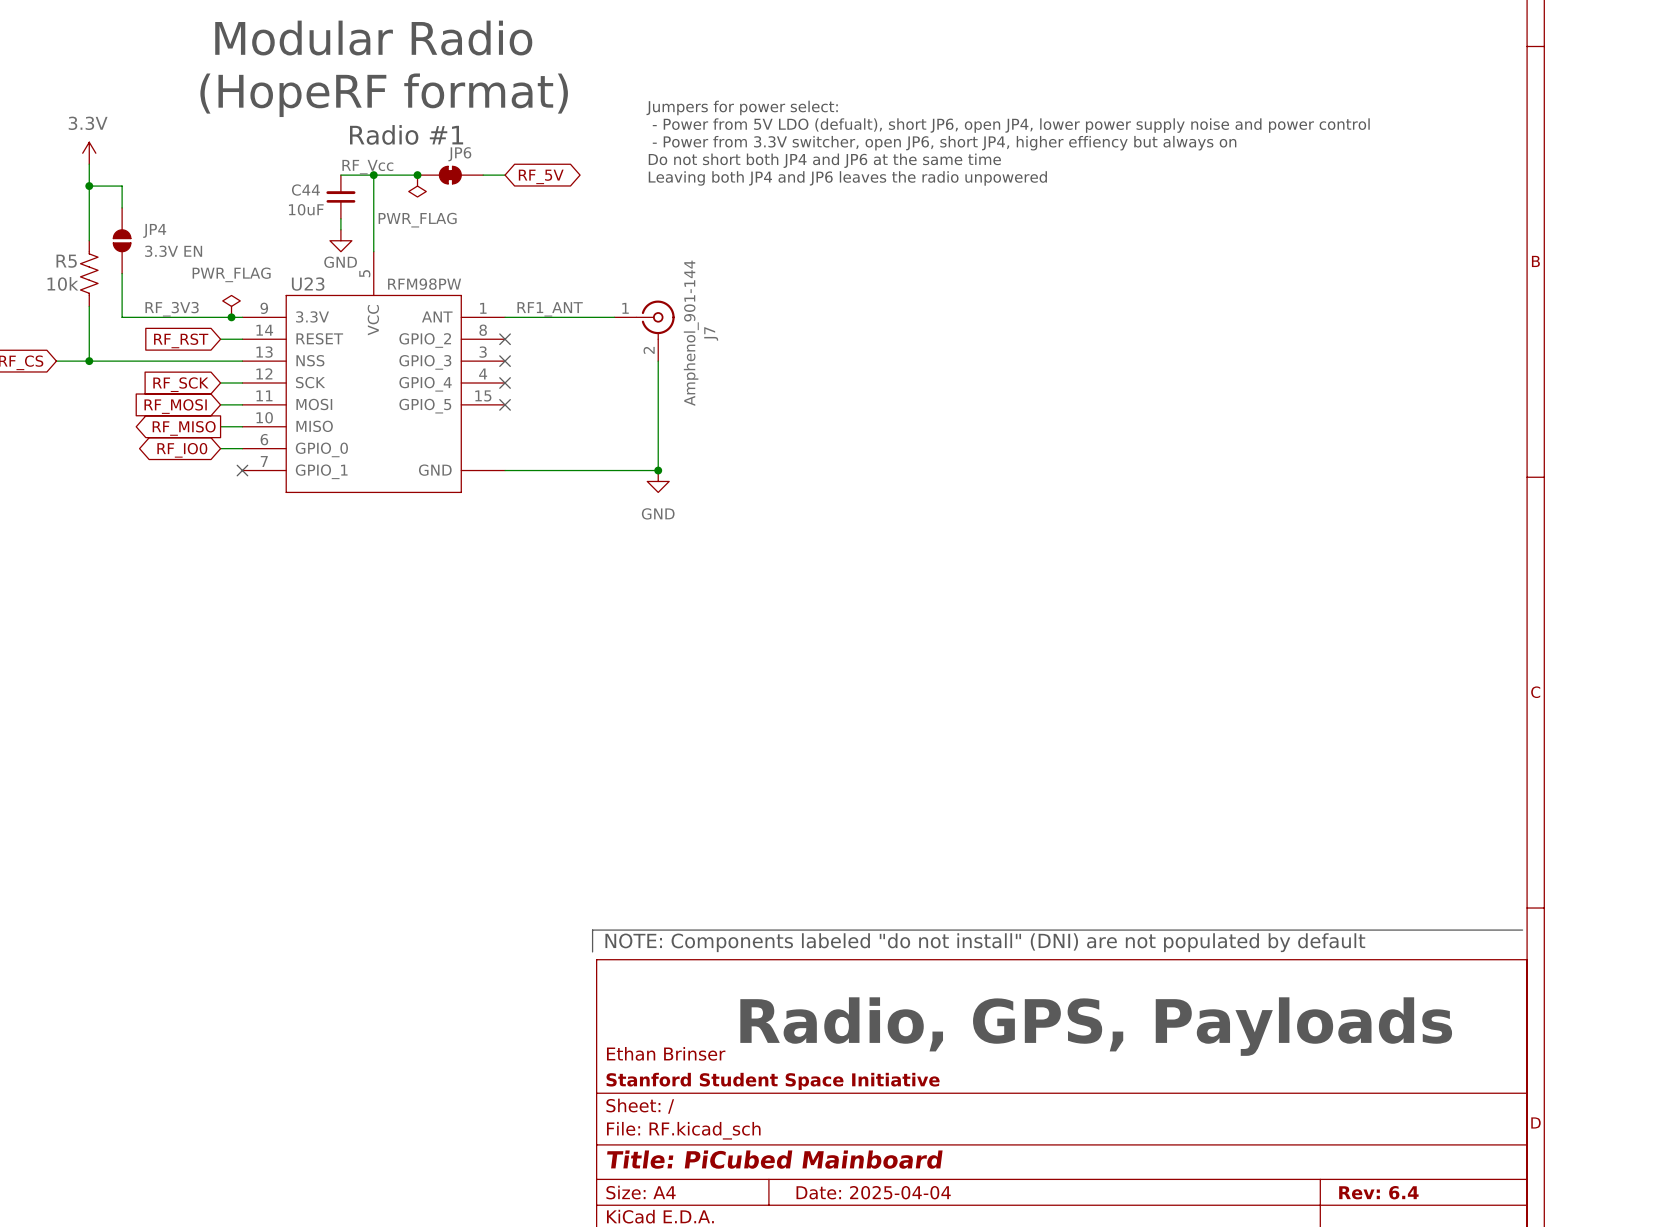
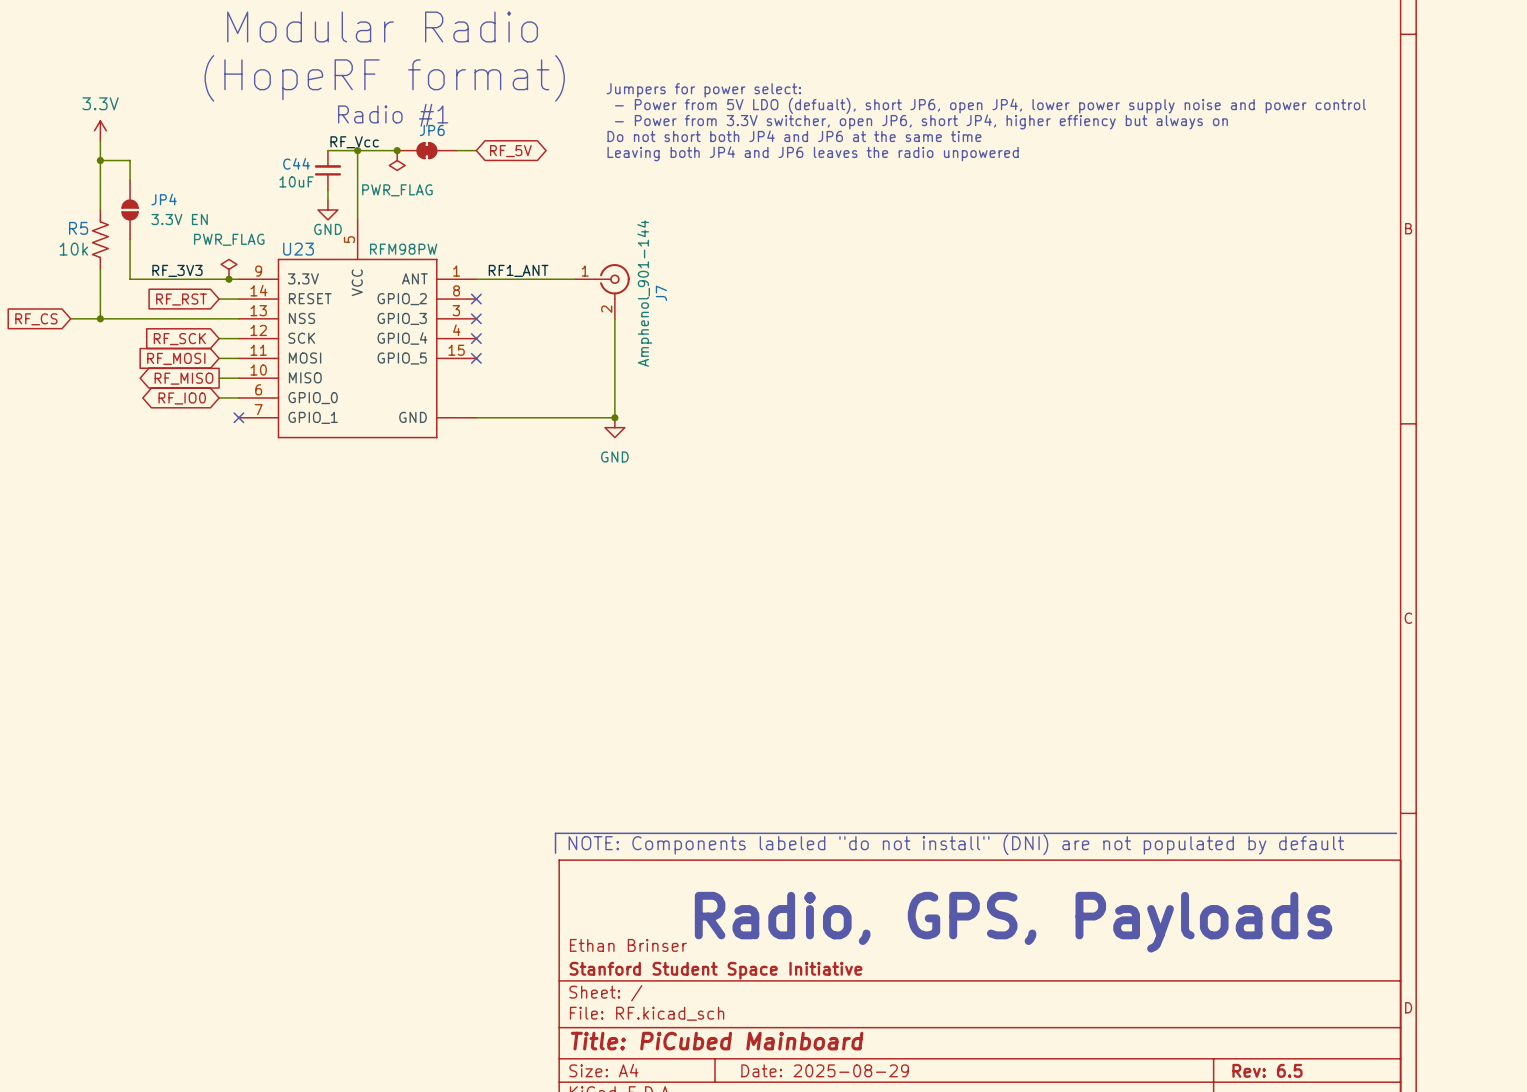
title block: Date: 2025-04-04 (873, 1192) -> Date: 2025-08-29 (825, 1070)
title block: Rev: 6.4 (1378, 1192) -> Rev: 6.5 (1267, 1070)

